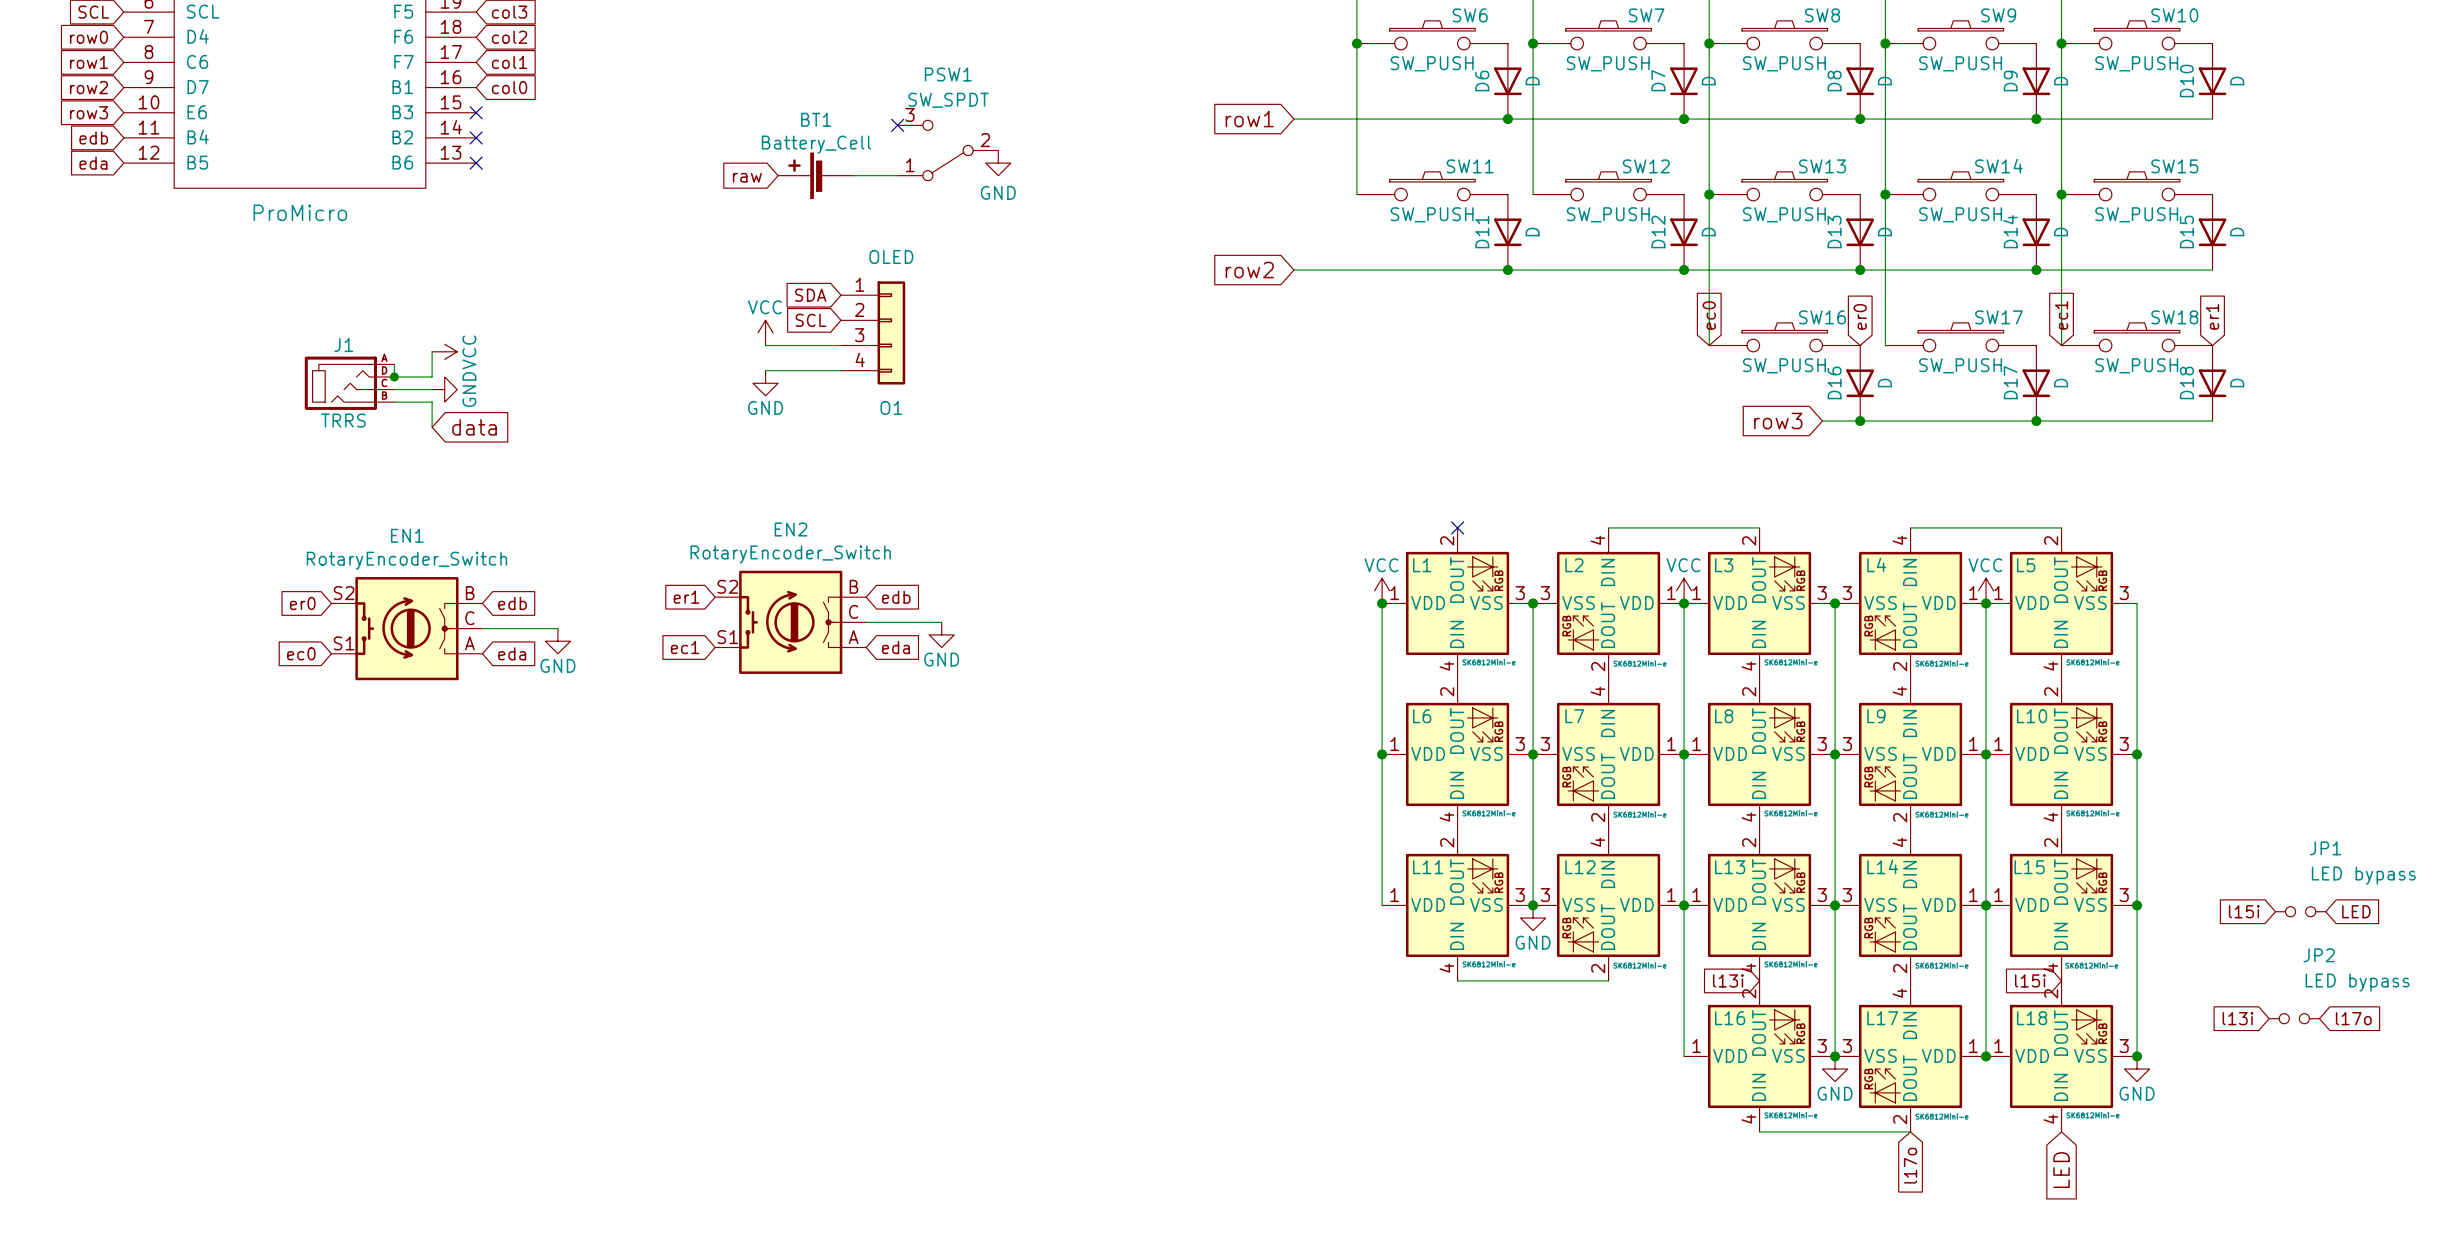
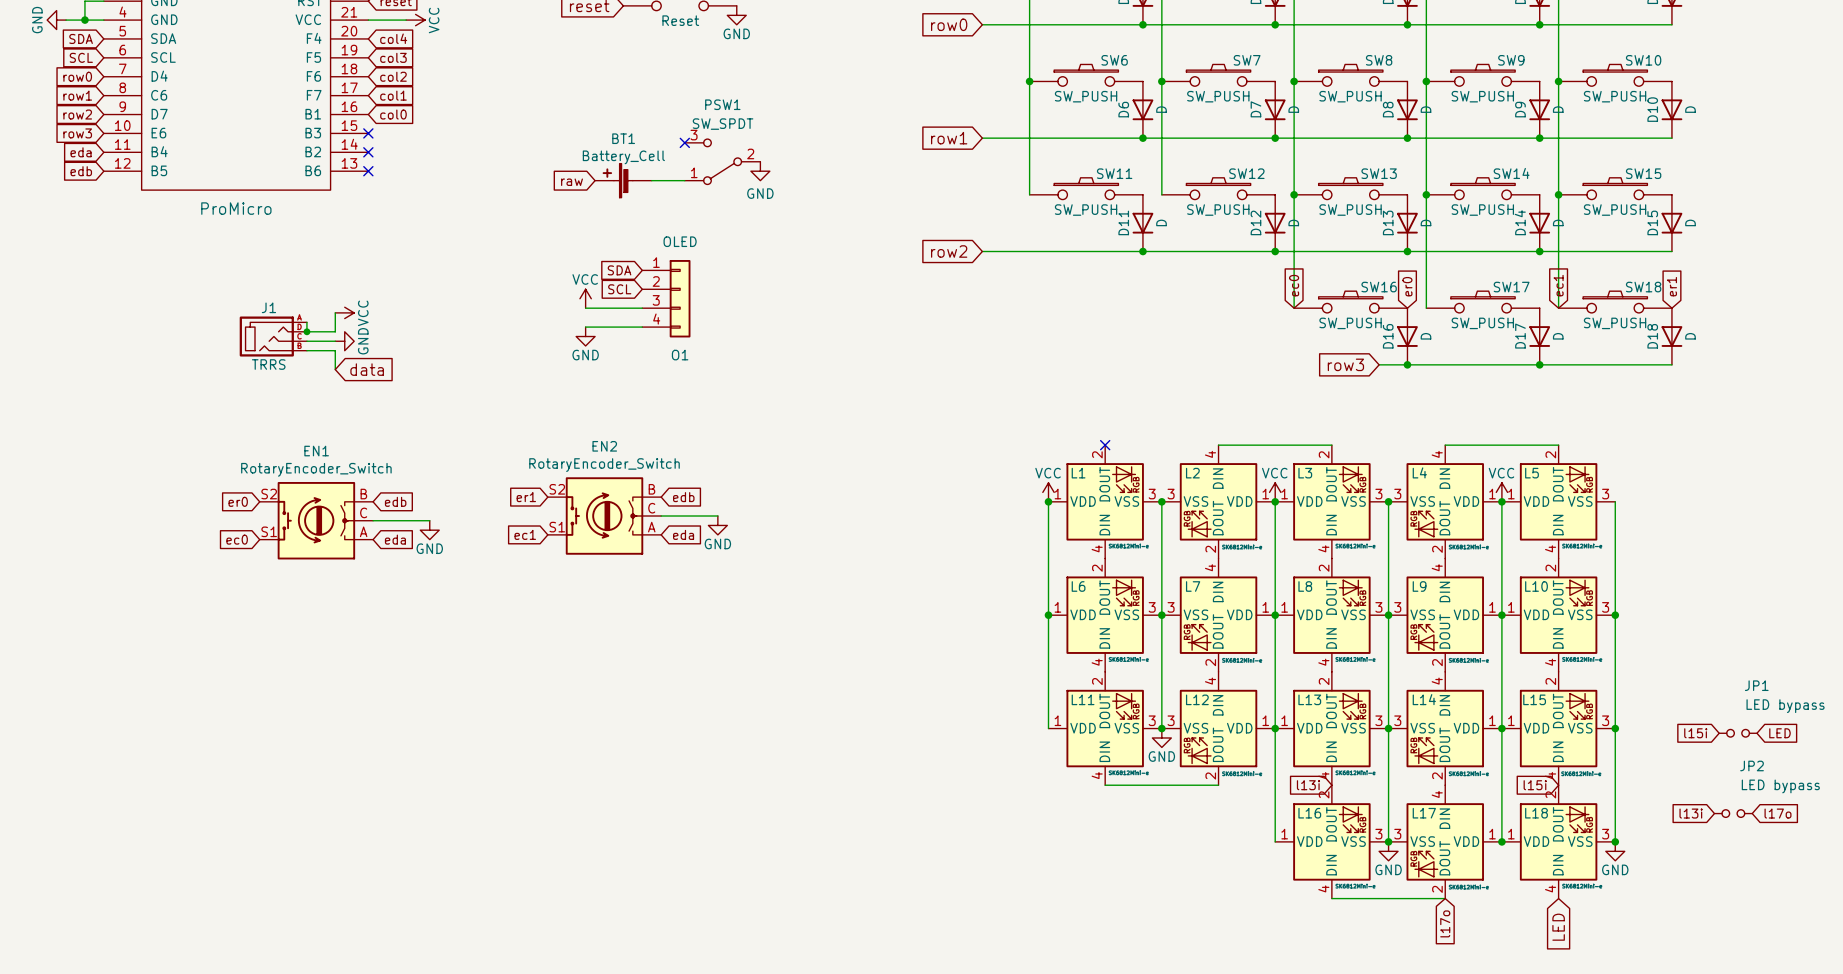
global label: edb (93, 137) -> eda (81, 152)
global label: eda (93, 163) -> edb (81, 171)

